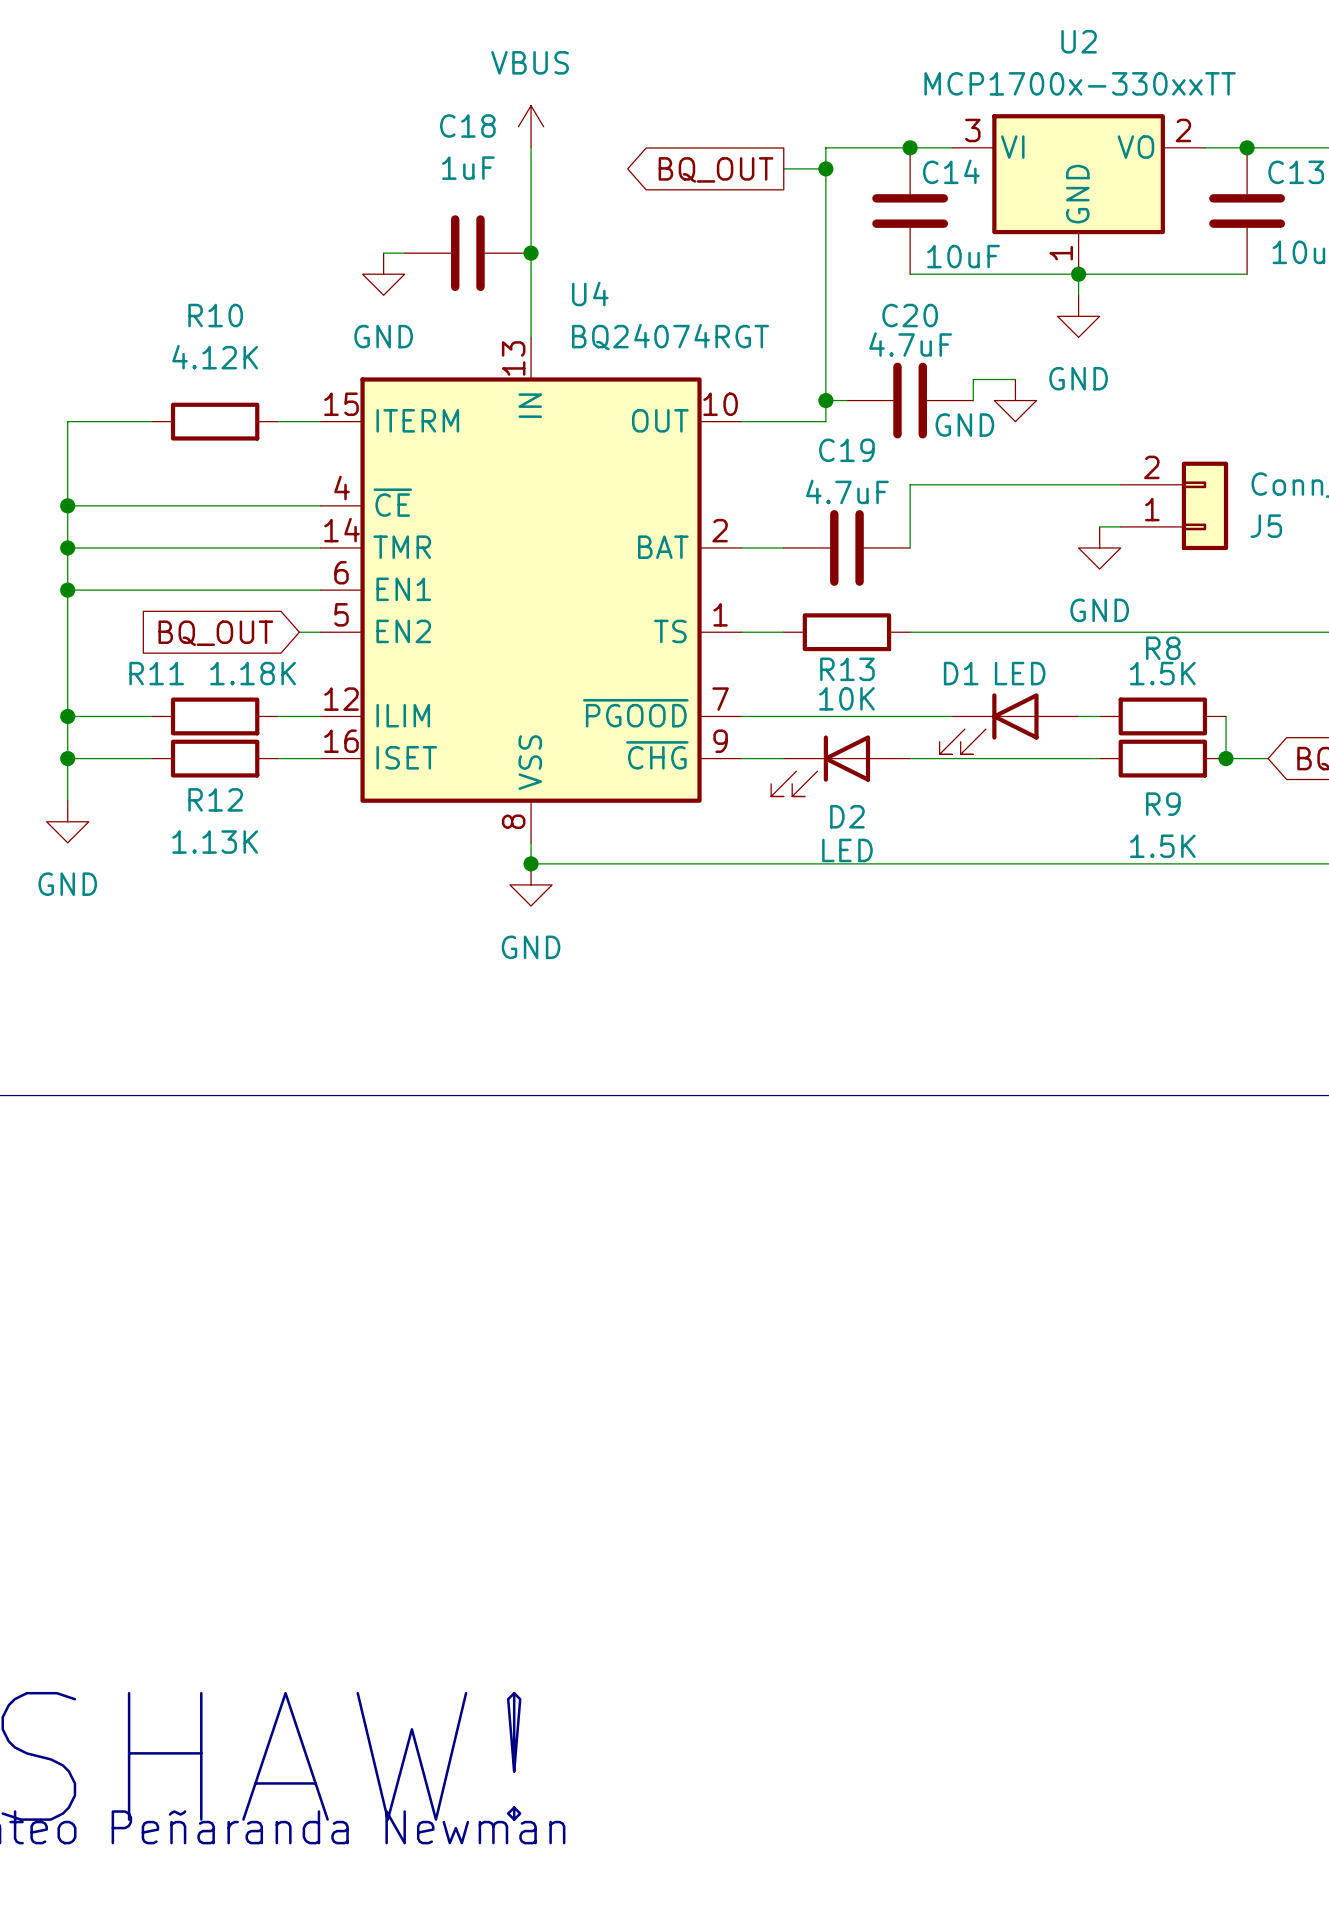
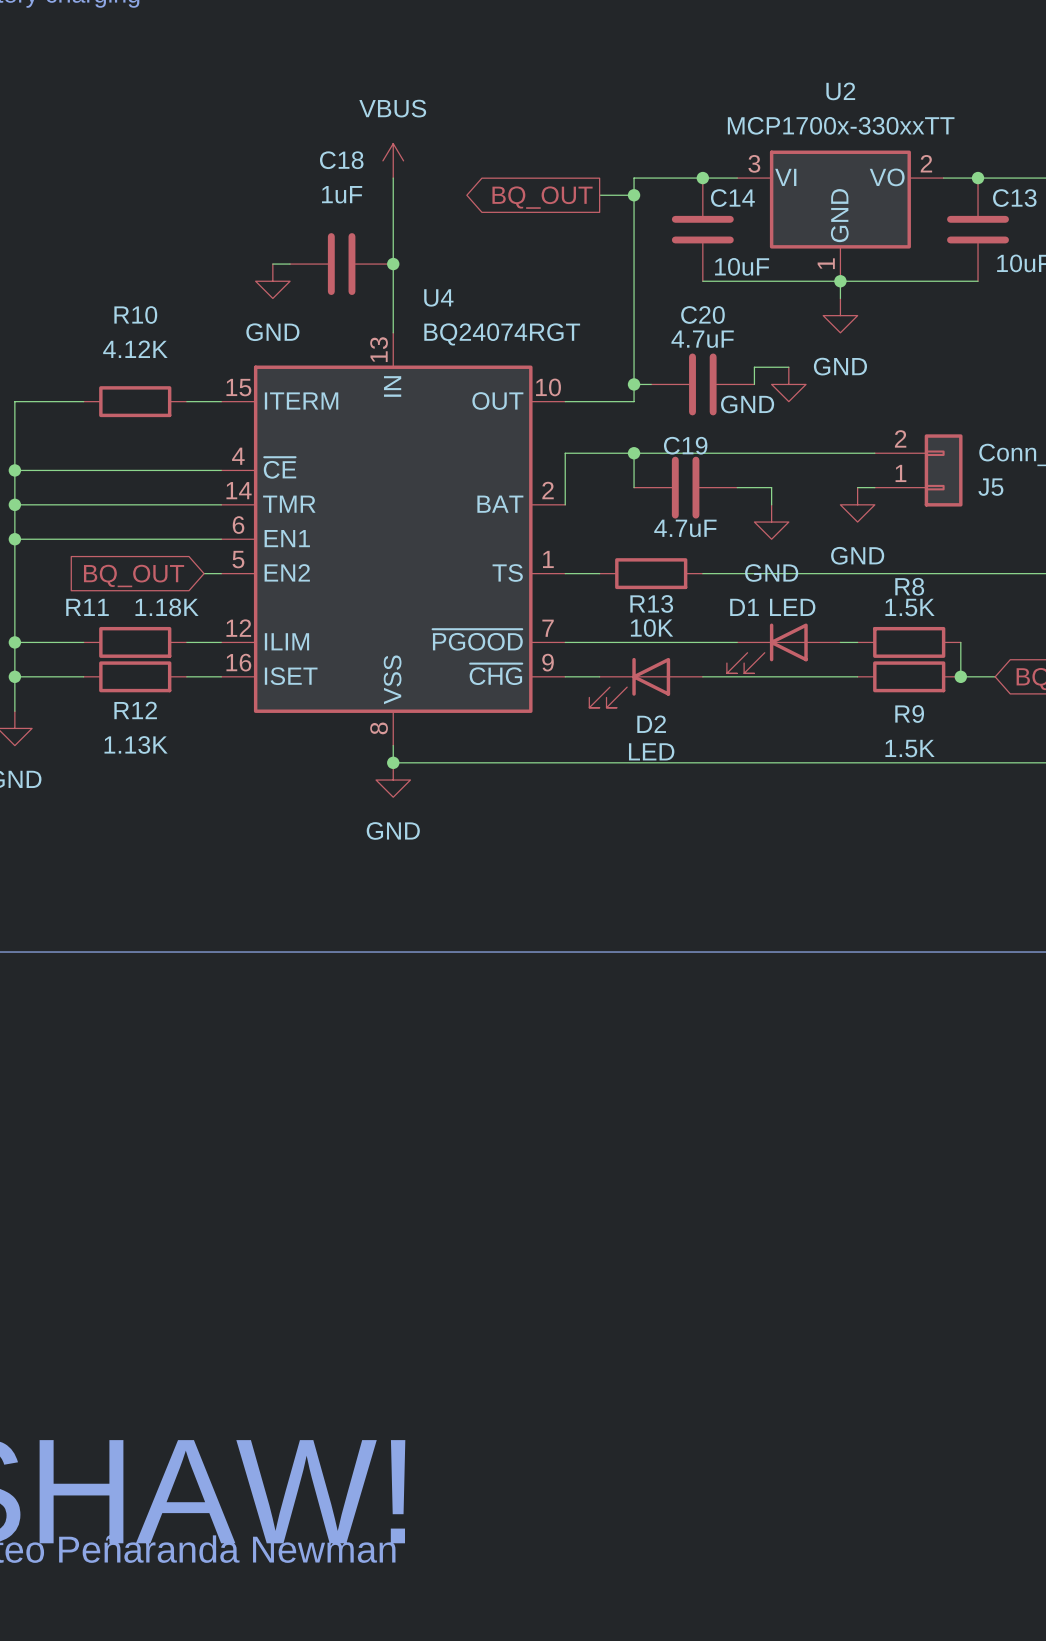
C19 name position: C19 (846, 450) -> C19 (685, 445)
wire: none -> (634, 453) (634, 487)
junction: none -> (634, 453)
wire: (910, 484) (910, 547) -> none
C19 value position: 4.7uF (847, 491) -> 4.7uF (685, 528)
wire: none -> (737, 487) (771, 487) (771, 504)
wire: (741, 547) (783, 547) -> (565, 504) (565, 453) (702, 453)
C19 position: (846, 547) -> (685, 487)
power symbol: none -> GND (771, 522)

